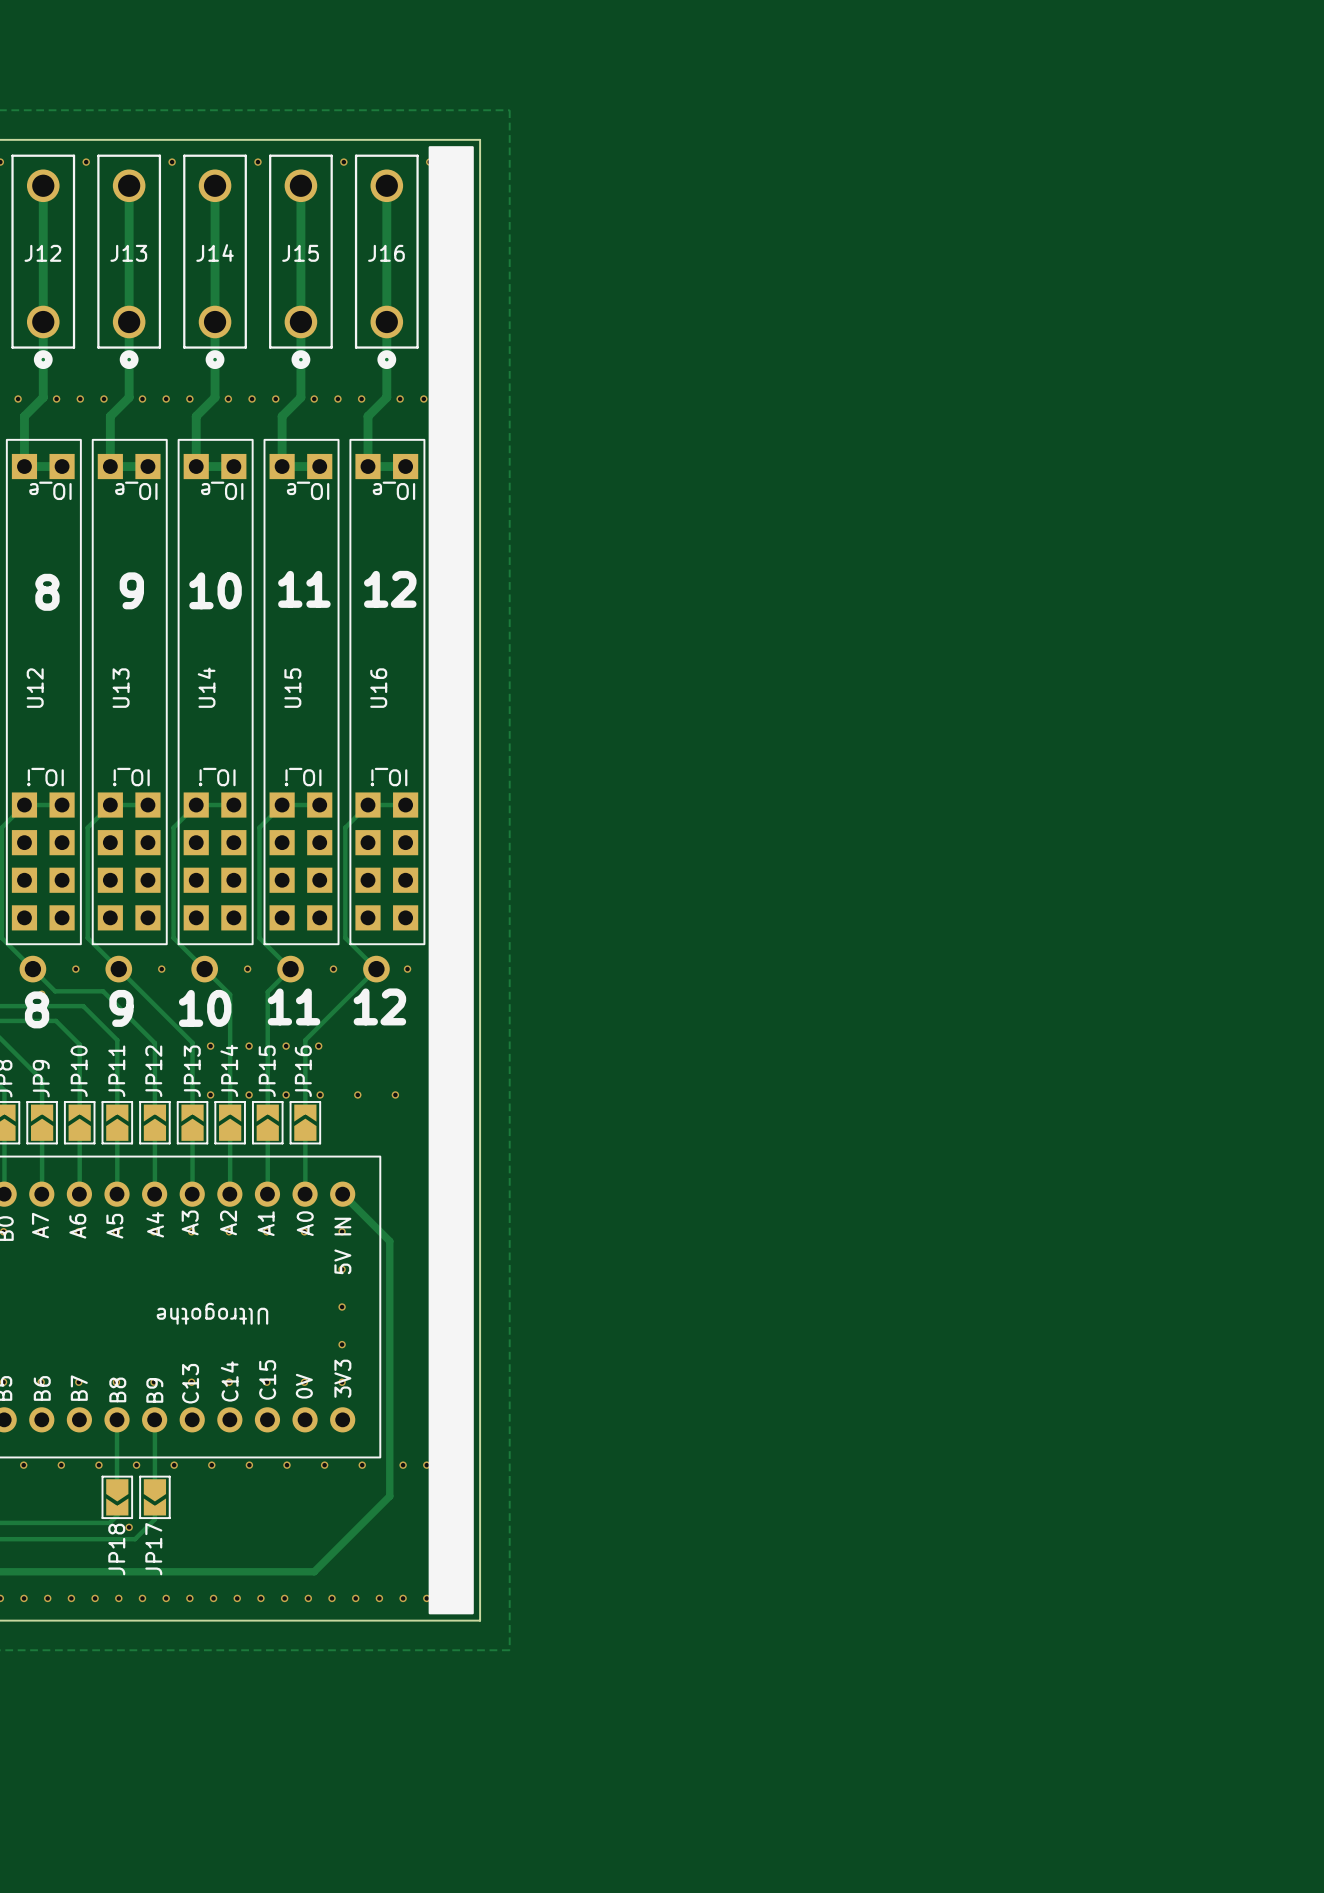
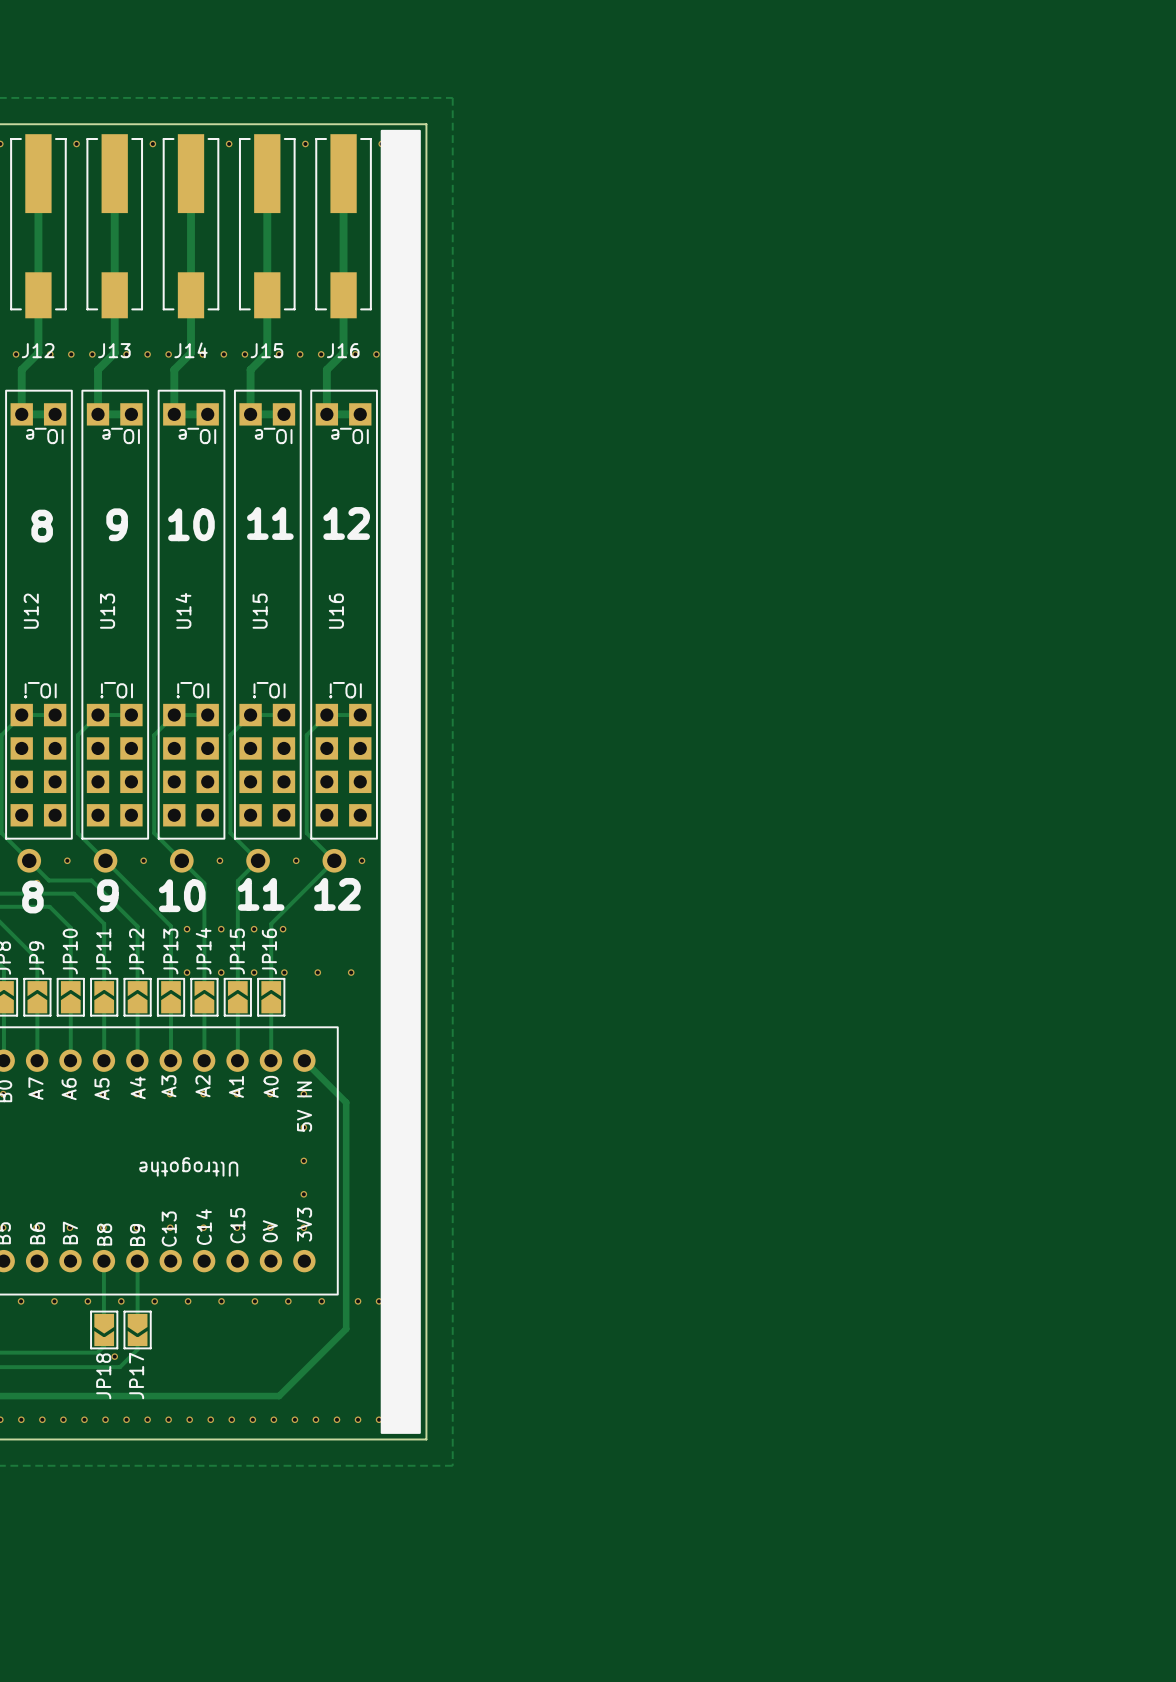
J12 footprint: [11, 154, 76, 370] -> [10, 134, 67, 319]
J13 footprint: [97, 154, 162, 370] -> [86, 134, 144, 319]
J14 footprint: [183, 154, 247, 370] -> [162, 134, 220, 319]
J15 footprint: [269, 154, 333, 370] -> [238, 134, 296, 319]
J16 footprint: [354, 154, 419, 370] -> [315, 134, 372, 319]
J14 name position: J14 (215, 252) -> J14 (191, 350)
J12 name position: J12 (42, 253) -> J12 (38, 350)
J13 name position: J13 (128, 253) -> J13 (114, 350)
J15 name position: J15 (300, 253) -> J15 (266, 350)
J16 name position: J16 (386, 253) -> J16 (343, 350)

